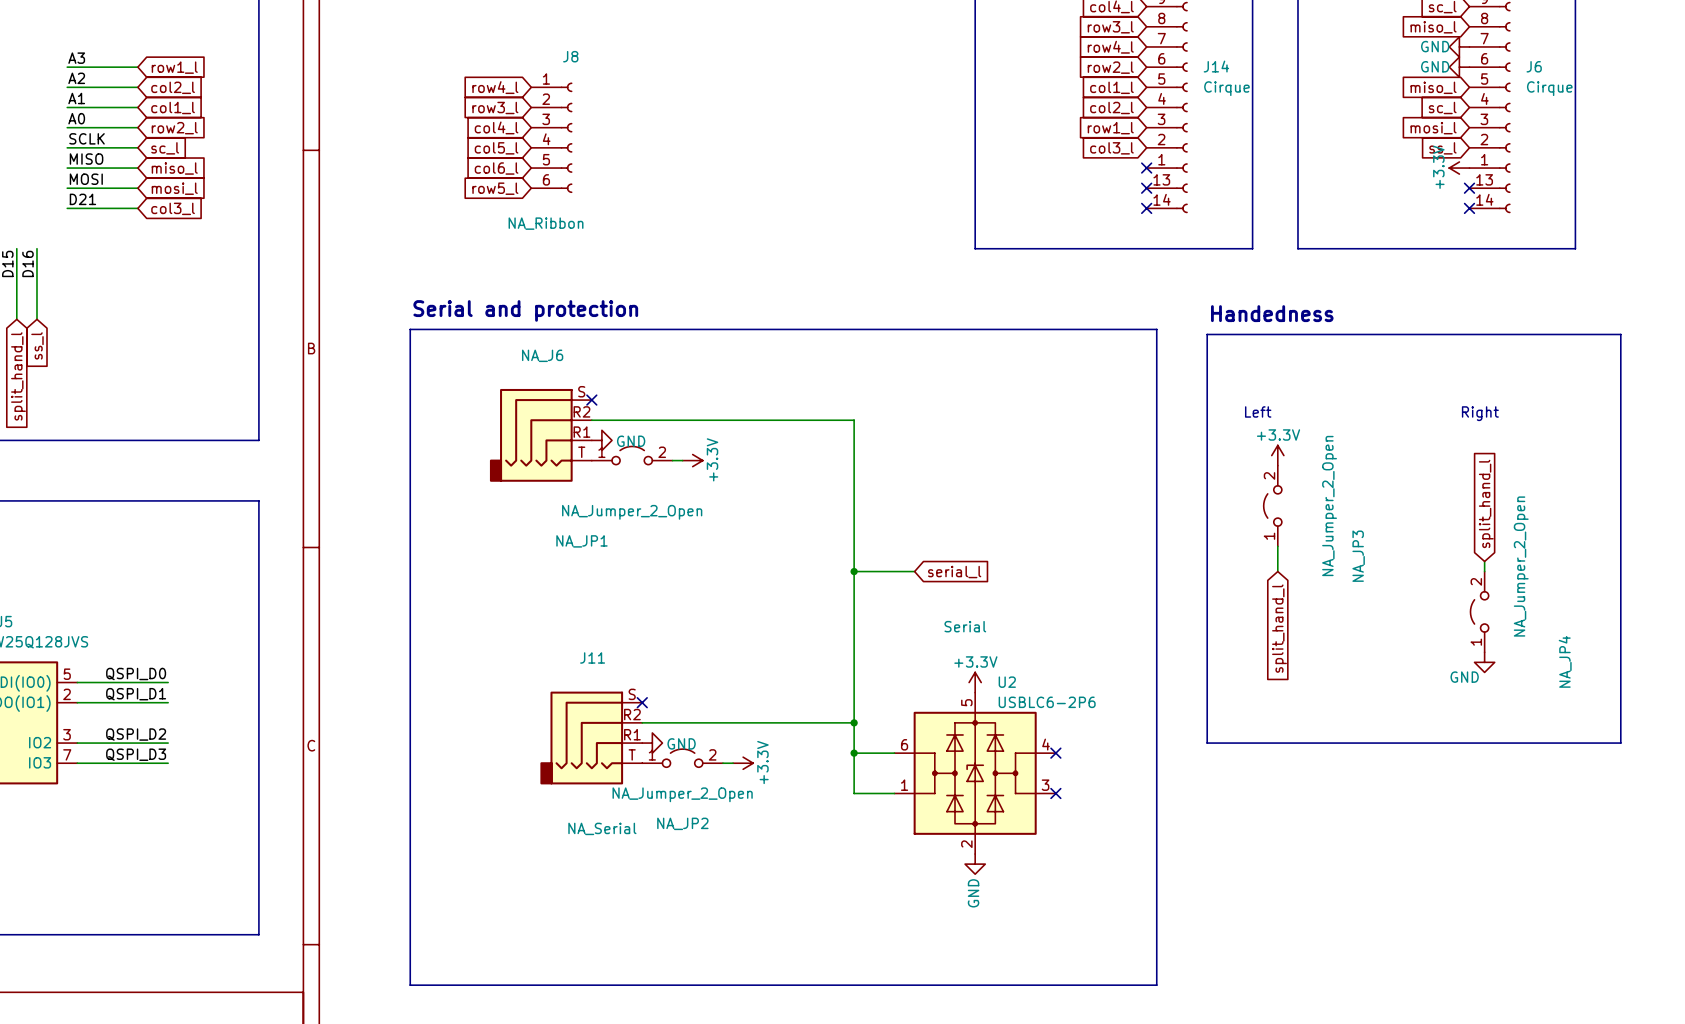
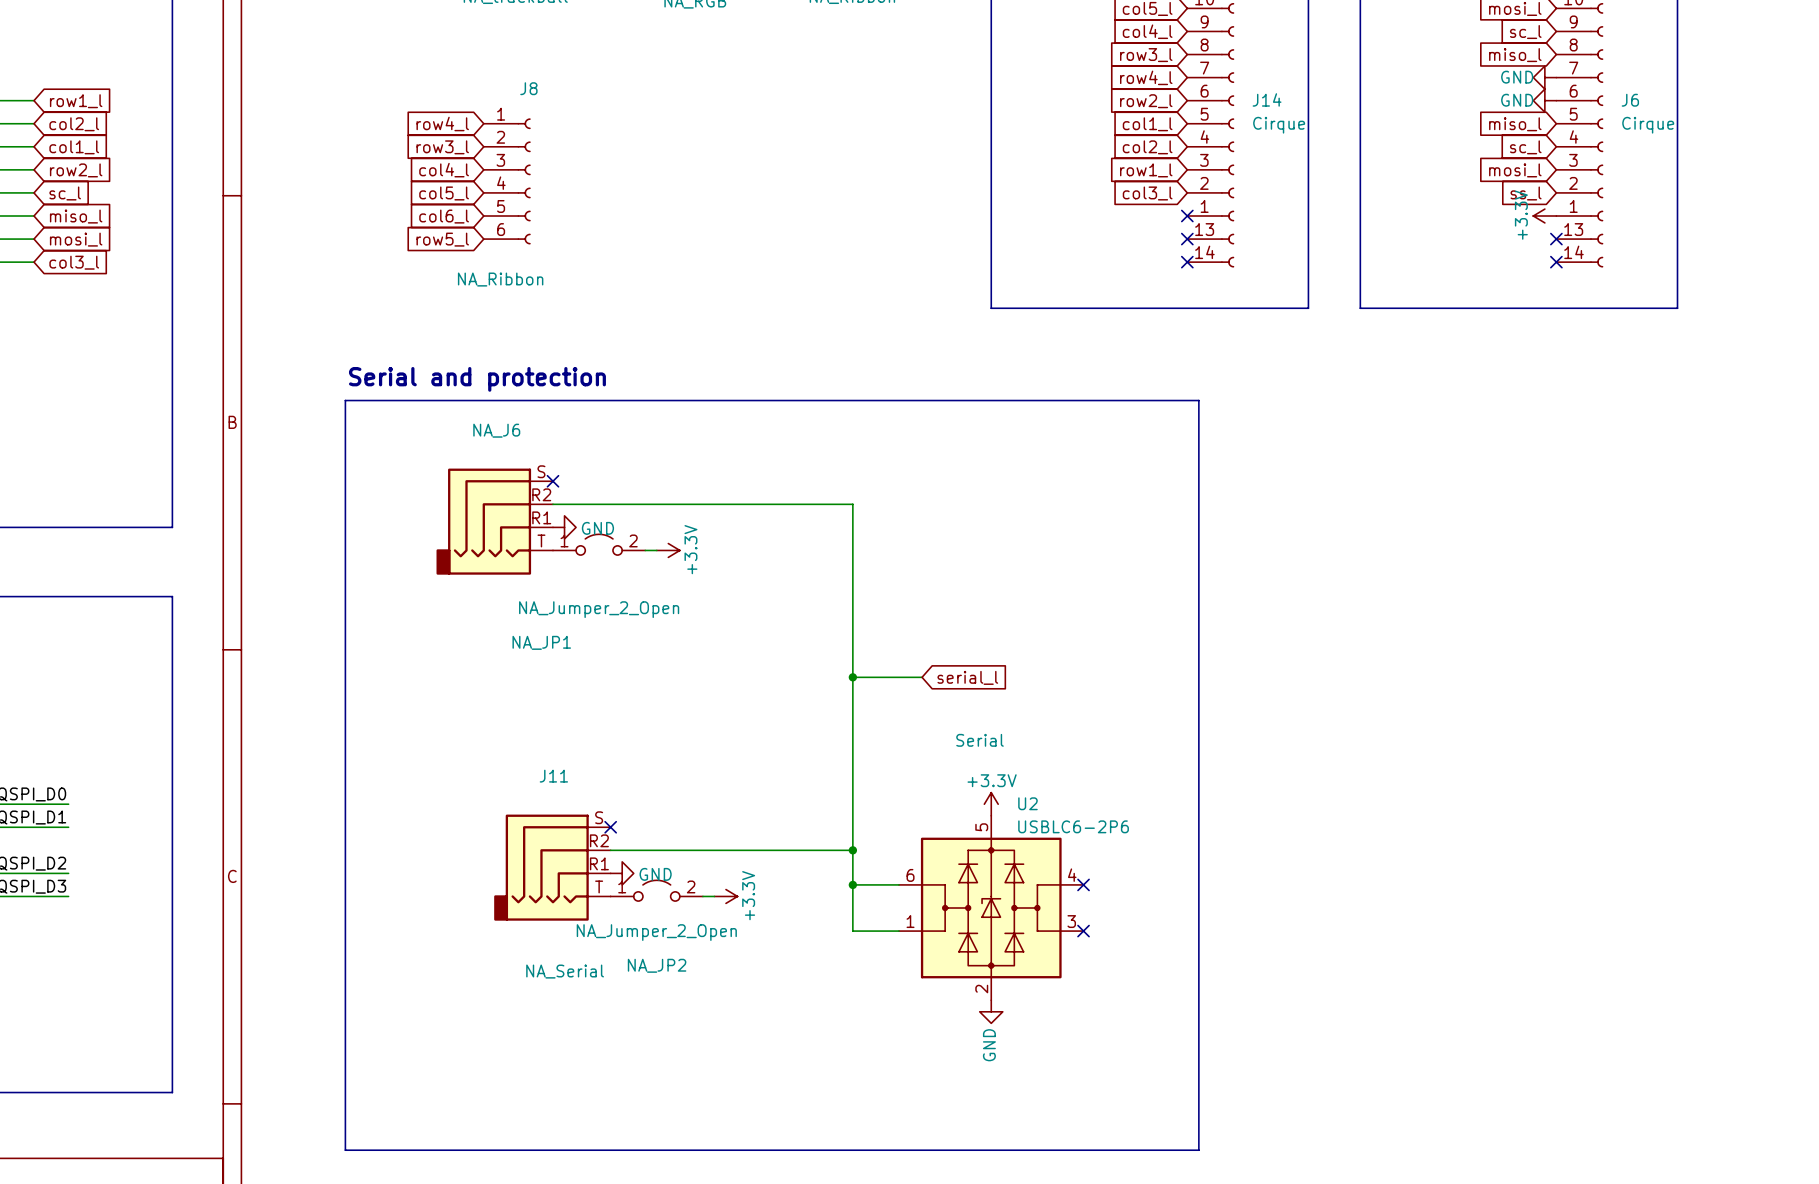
text: Handedness (1272, 313) -> none
line: (1207, 334) (1620, 334) (1620, 743) (1207, 743) (1207, 334) -> none
text: Left (1258, 411) -> none
text: Right (1480, 413) -> none
power symbol: +3.3V (1277, 455) -> none
global label: split_hand_l (1486, 503) -> none
NA_JP3: NA_Jumper_2_Open (1272, 505) -> none
wire: (1277, 546) (1277, 571) -> none
wire: (1484, 561) (1484, 571) -> none
NA_JP4: NA_Jumper_2_Open (1479, 611) -> none
global label: split_hand_l (1279, 628) -> none
power symbol: GND (1484, 662) -> none

